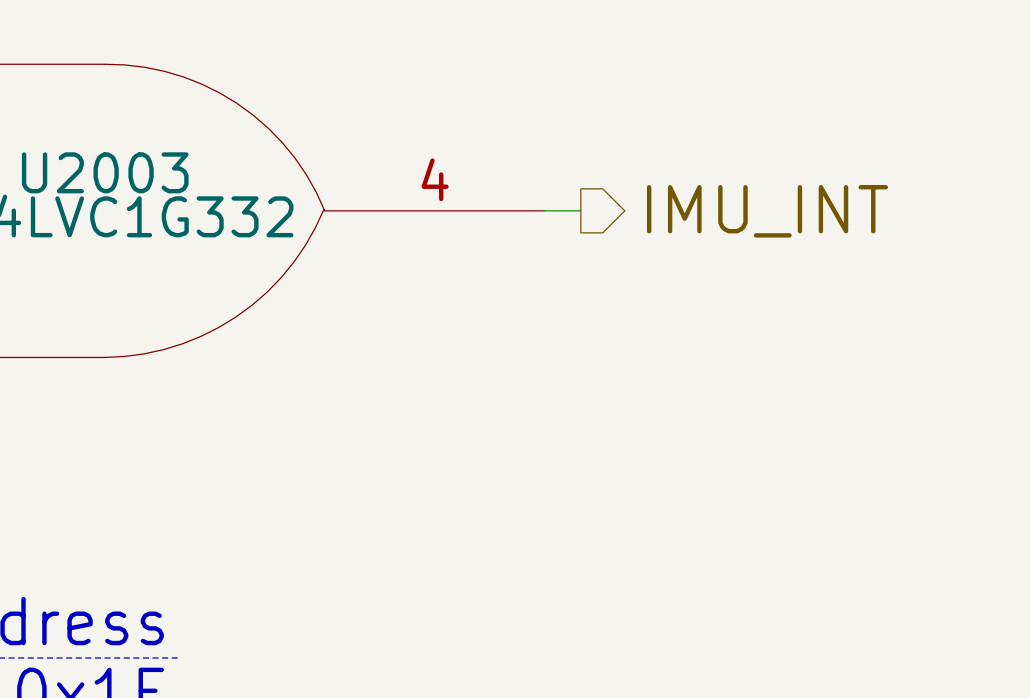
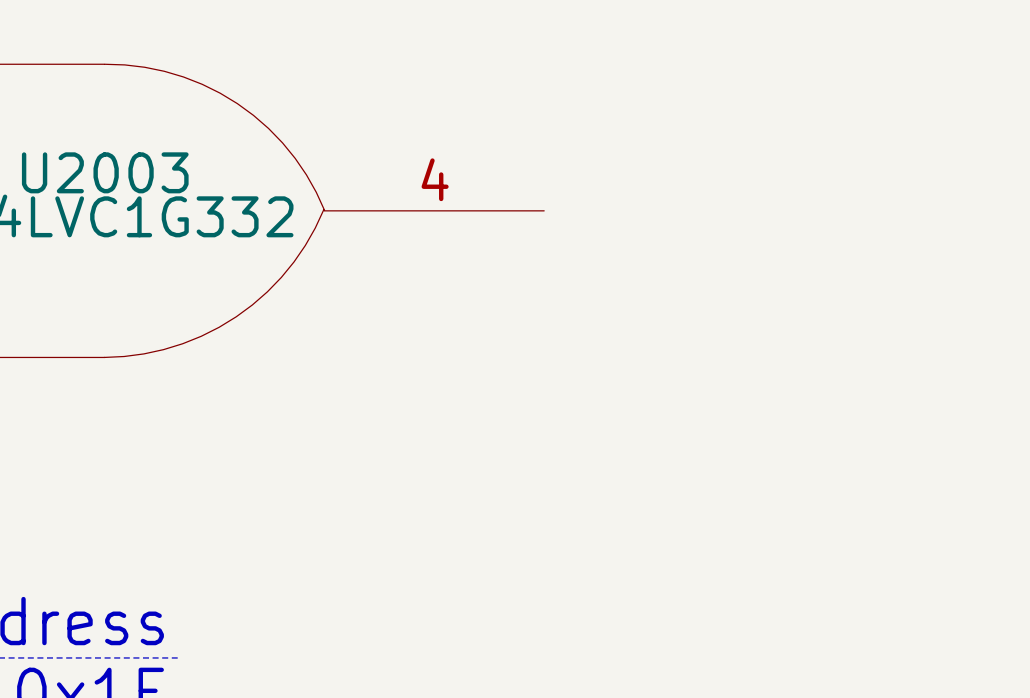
wire: (544, 210) (580, 210) -> none
hierarchical label: IMU_INT (767, 211) -> none

